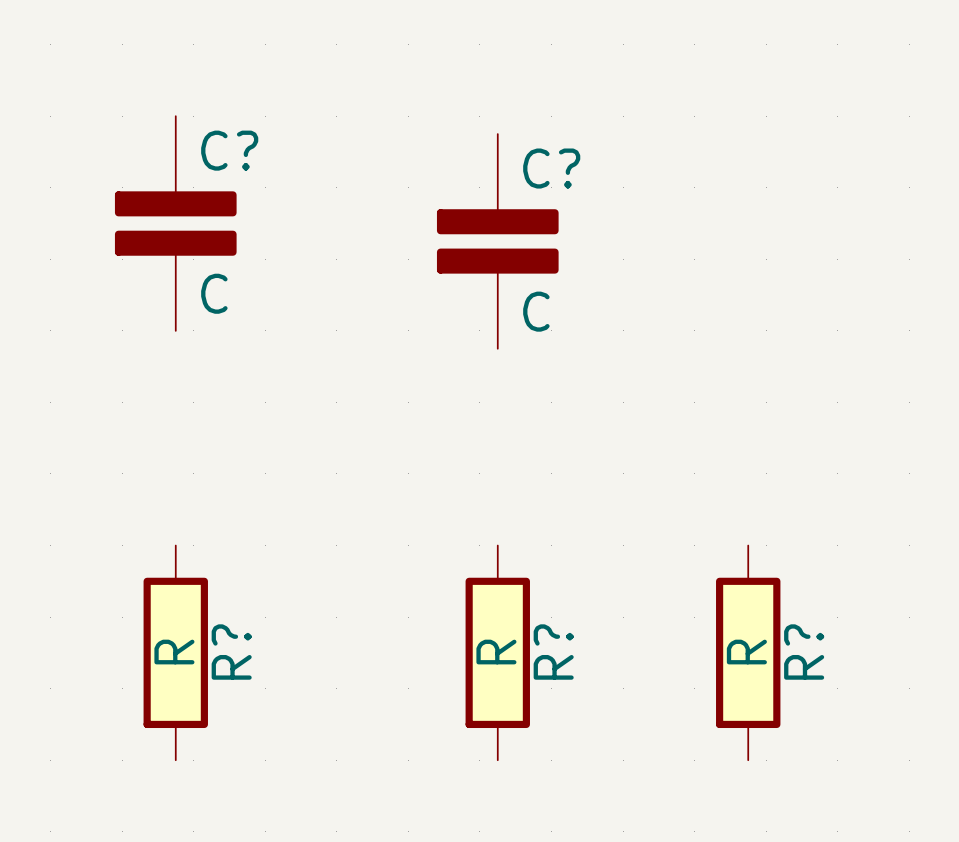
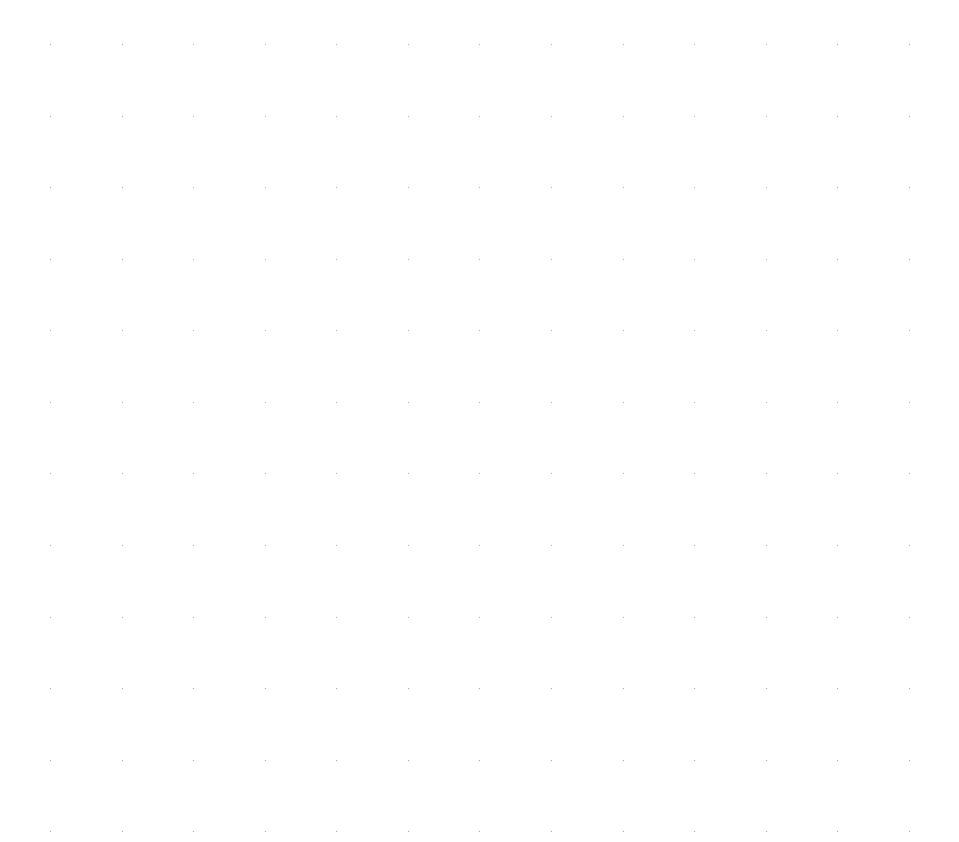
C?: C (175, 223) -> none
C?: C (497, 241) -> none
R?: R (175, 652) -> none
R?: R (497, 652) -> none
R?: R (748, 652) -> none

